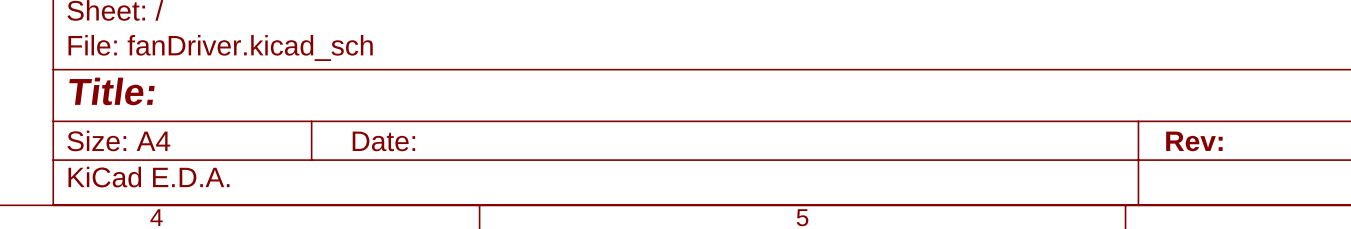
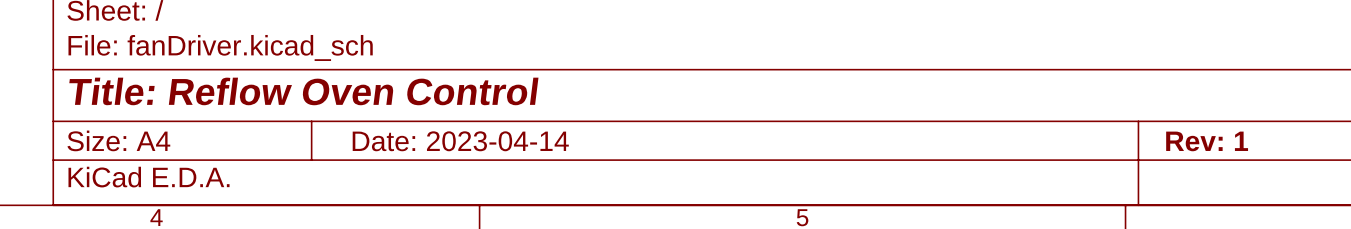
title block: Title: (111, 91) -> Title: Reflow Oven Control (303, 91)
title block: Date: (383, 141) -> Date: 2023-04-14 (460, 141)
title block: Rev: (1194, 141) -> Rev: 1 (1207, 141)

